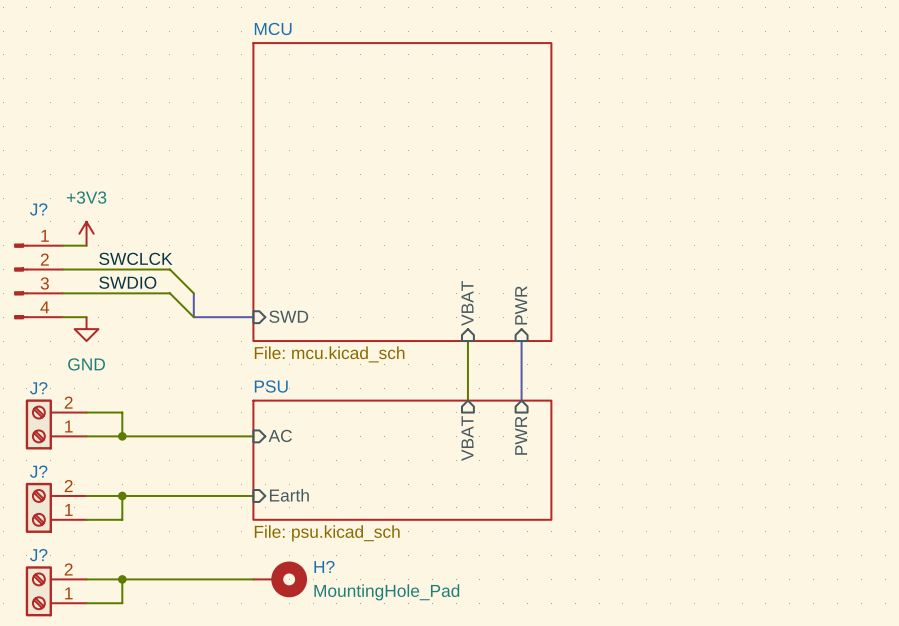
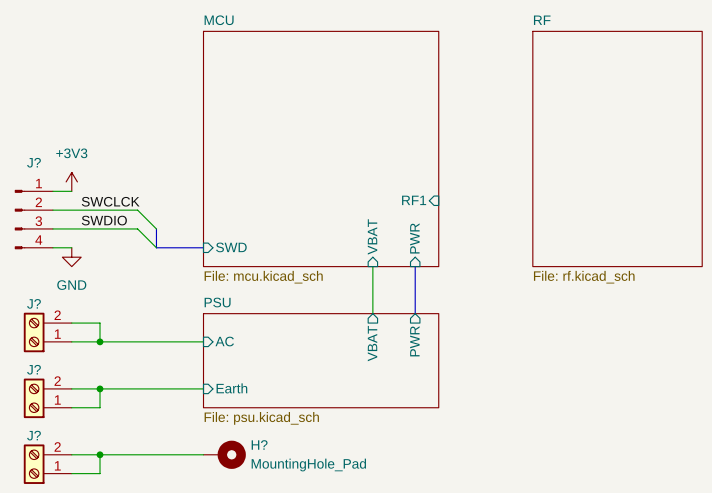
sheet RF: none -> File: rf.kicad_sch (617, 148)
sheet pin: none -> RF1 (414, 200)

